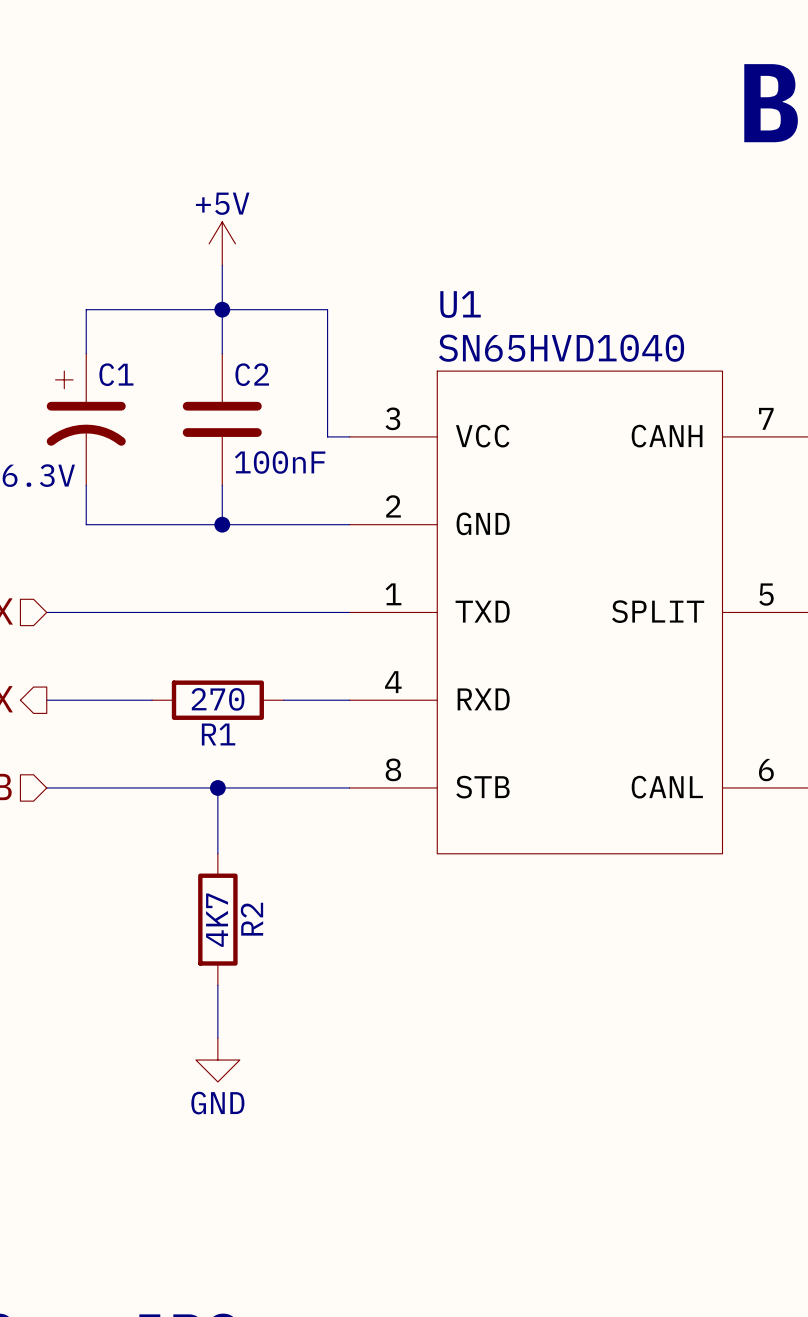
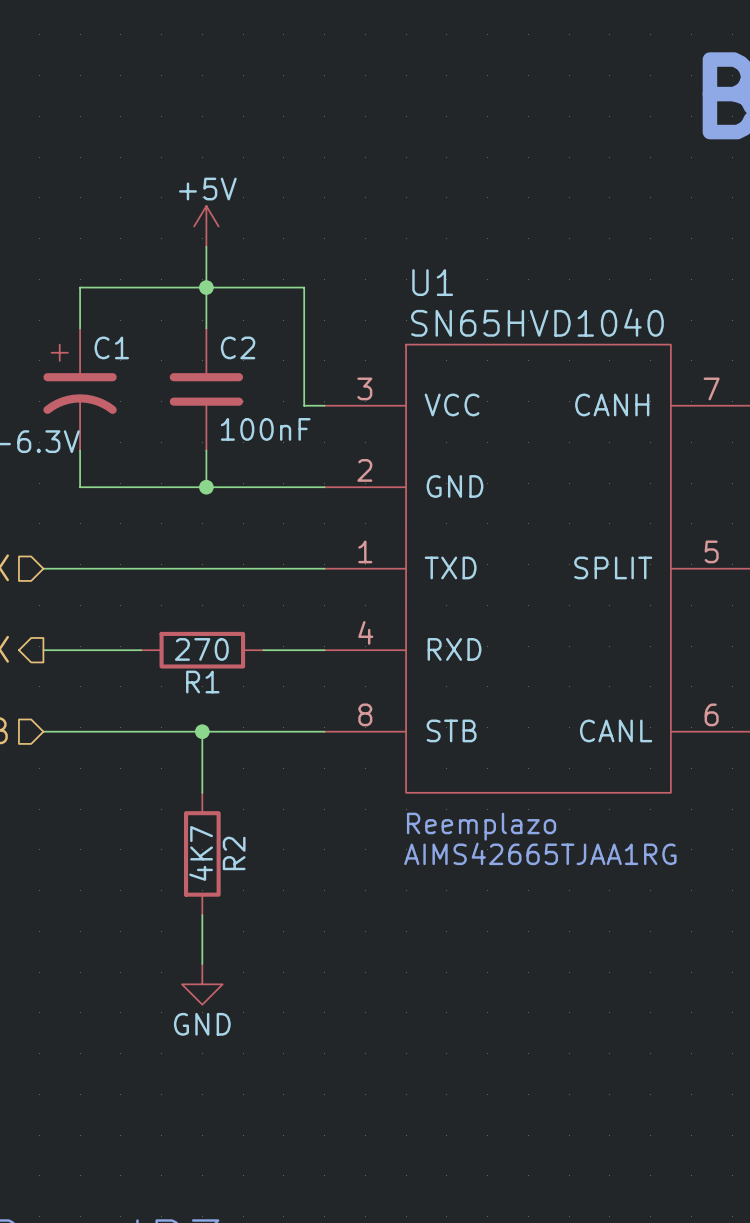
text: none -> Reemplazo (481, 826)
text: none -> AIMS42665TJAA1RG (540, 853)

